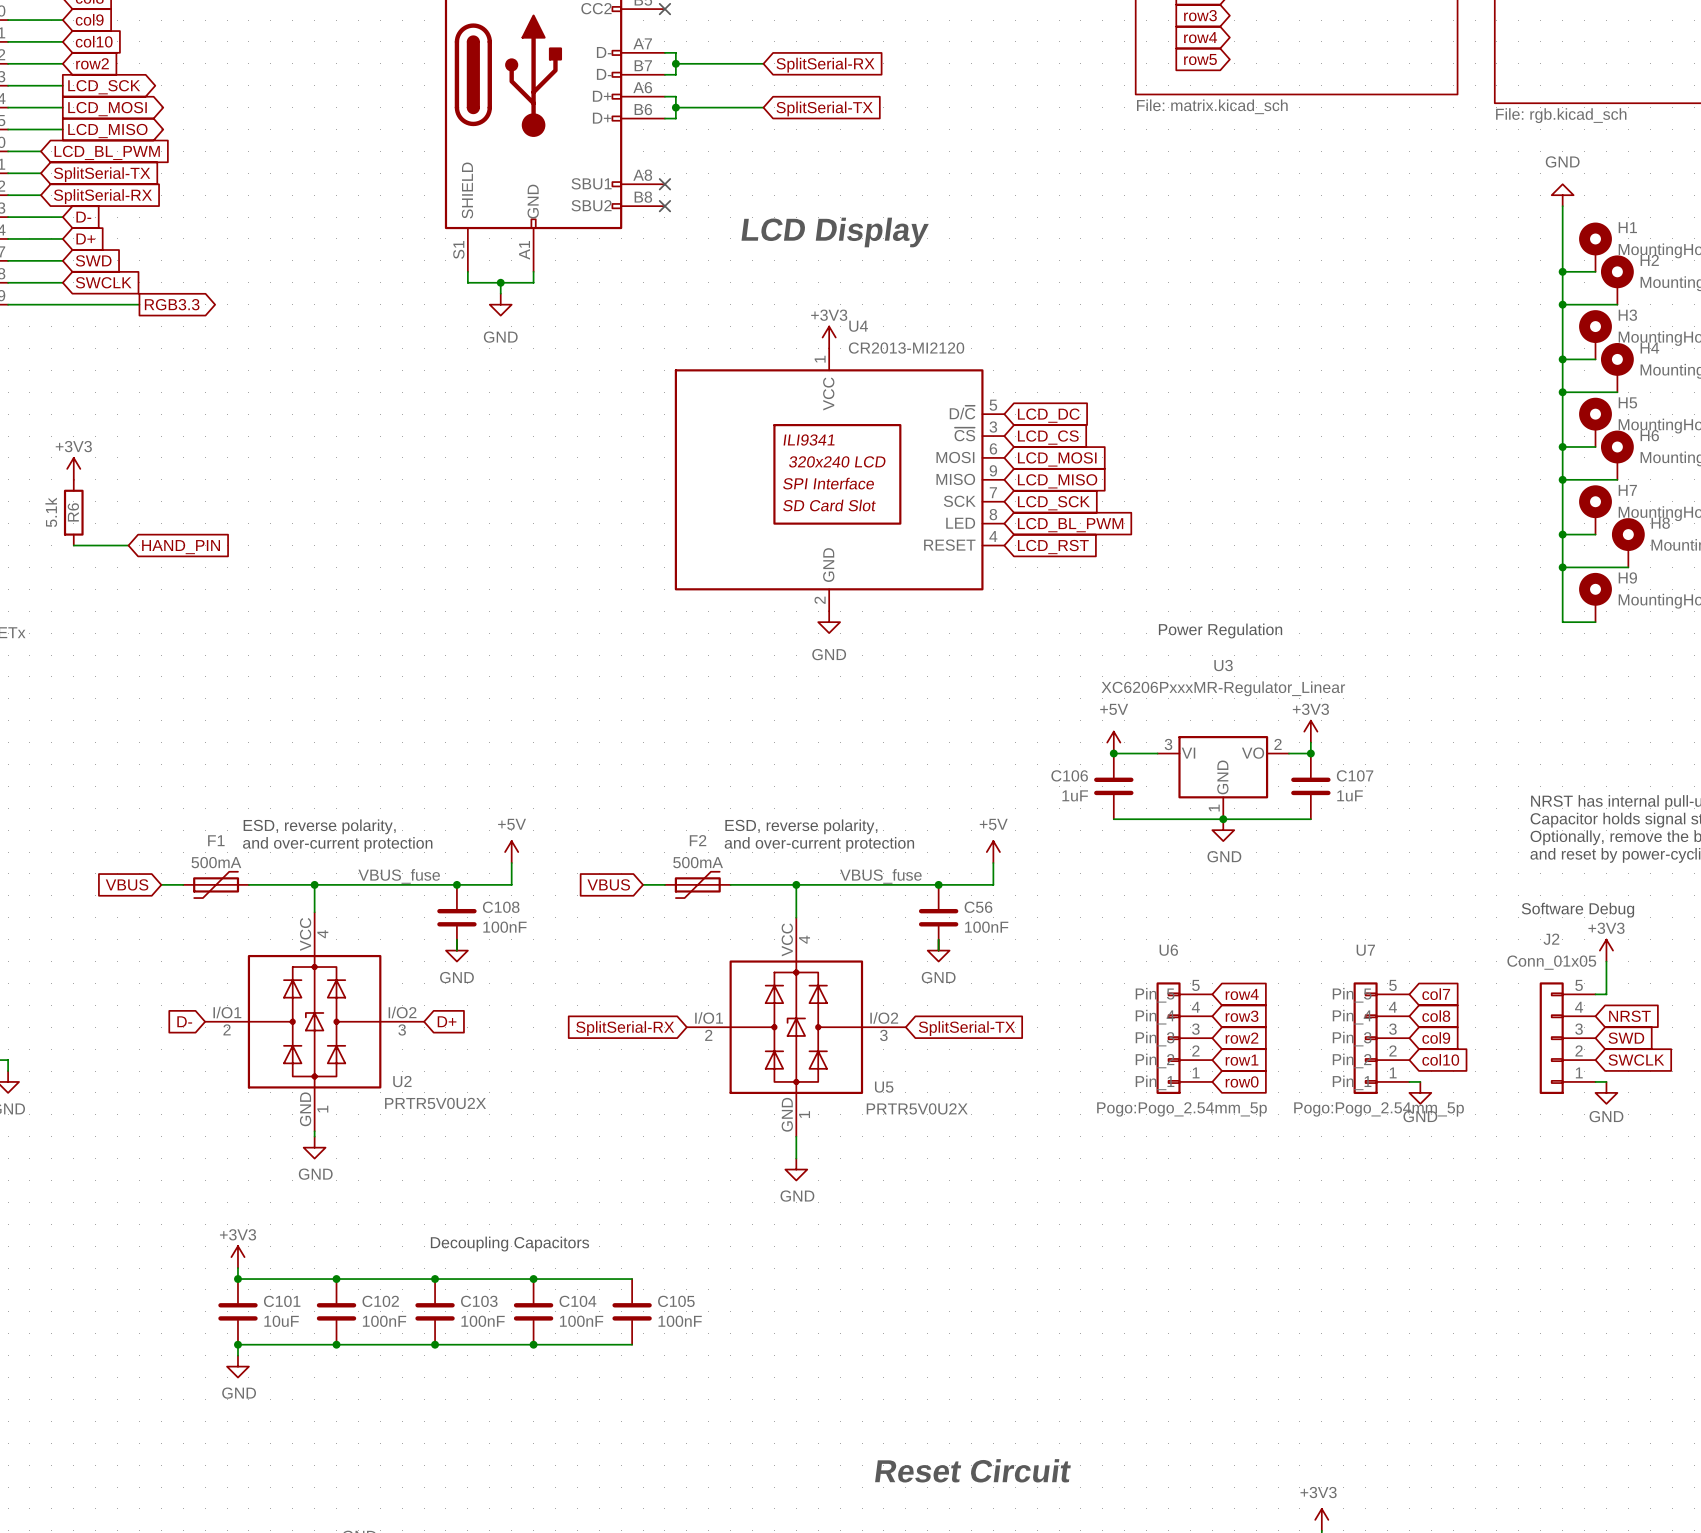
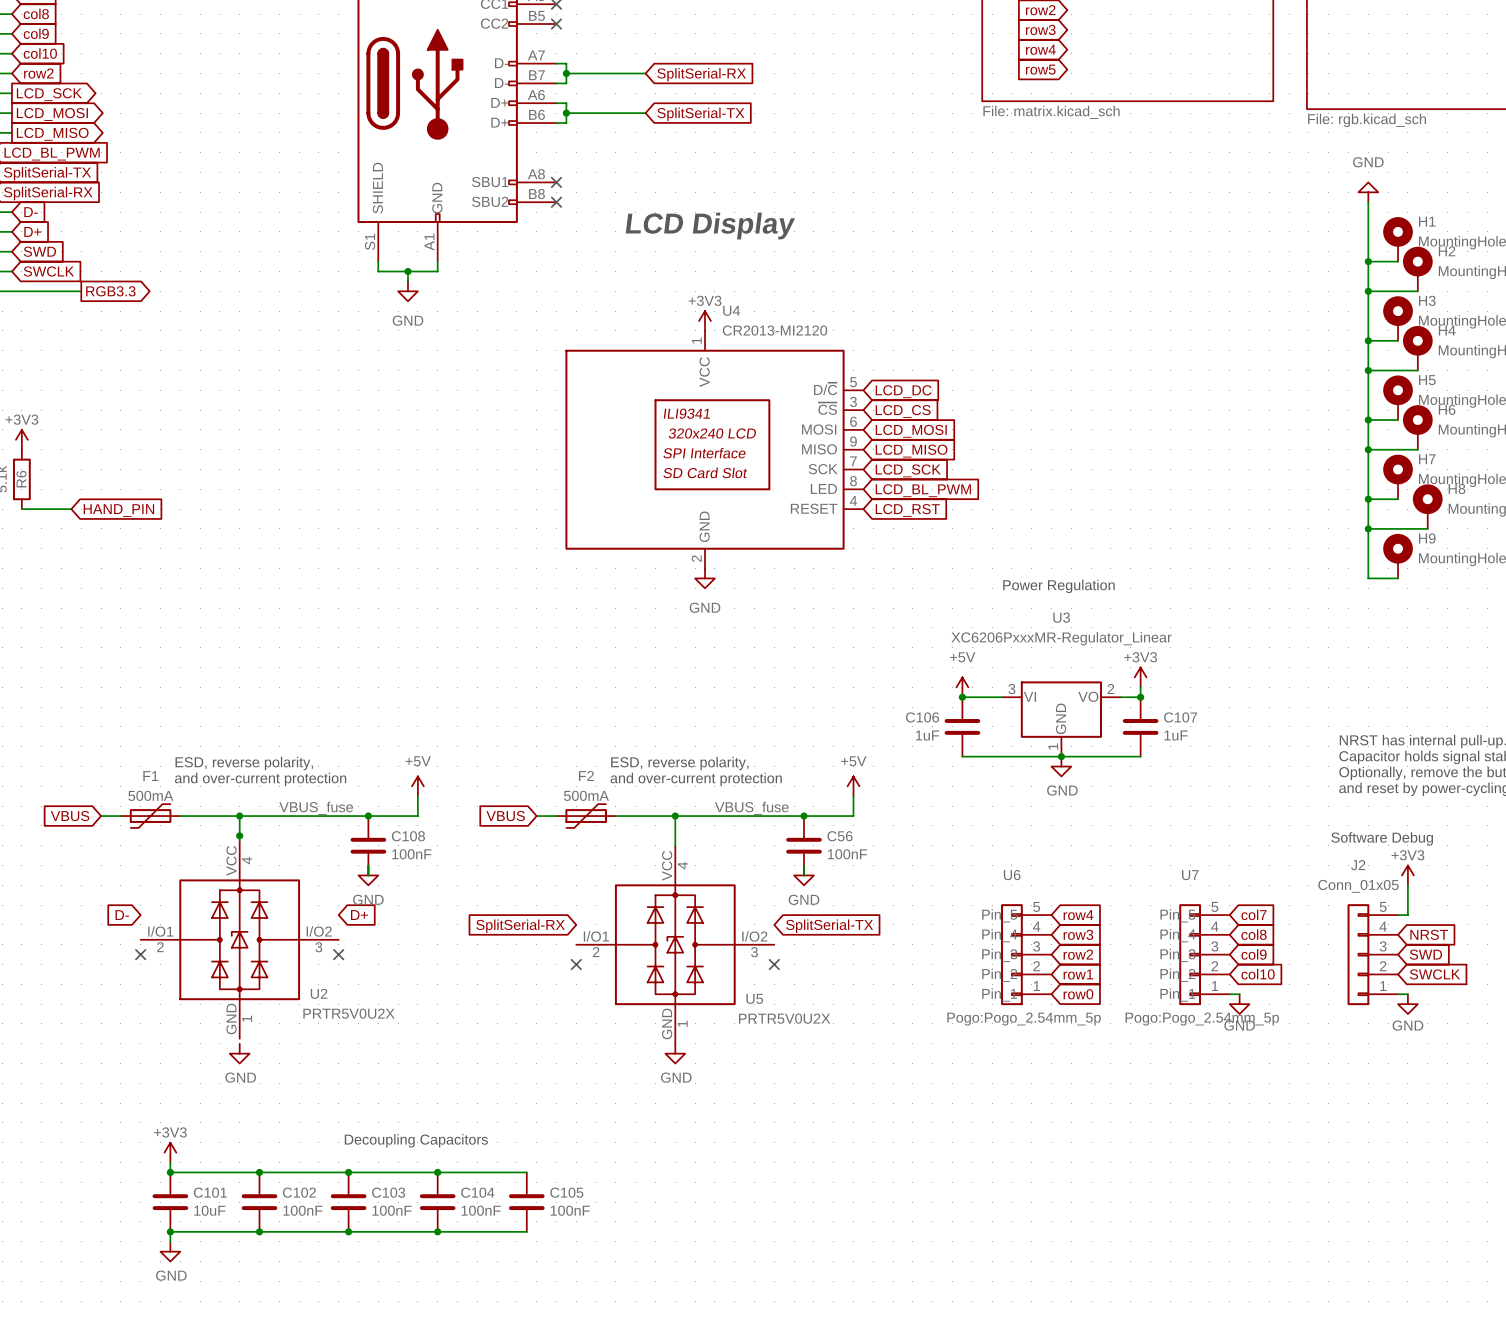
junction: none -> (239, 835)
global label position: D- (184, 1021) -> D- (122, 915)
global label position: D+ (447, 1021) -> D+ (359, 915)
global label position: SplitSerial-RX (625, 1028) -> SplitSerial-RX (520, 926)
global label position: SplitSerial-TX (966, 1028) -> SplitSerial-TX (829, 926)
no-connect mark: none -> (140, 954)
no-connect mark: none -> (338, 954)
no-connect mark: none -> (576, 964)
no-connect mark: none -> (774, 964)
wire: (314, 1131) (314, 1136) -> none
power symbol position: GND (796, 1169) -> GND (675, 1053)

